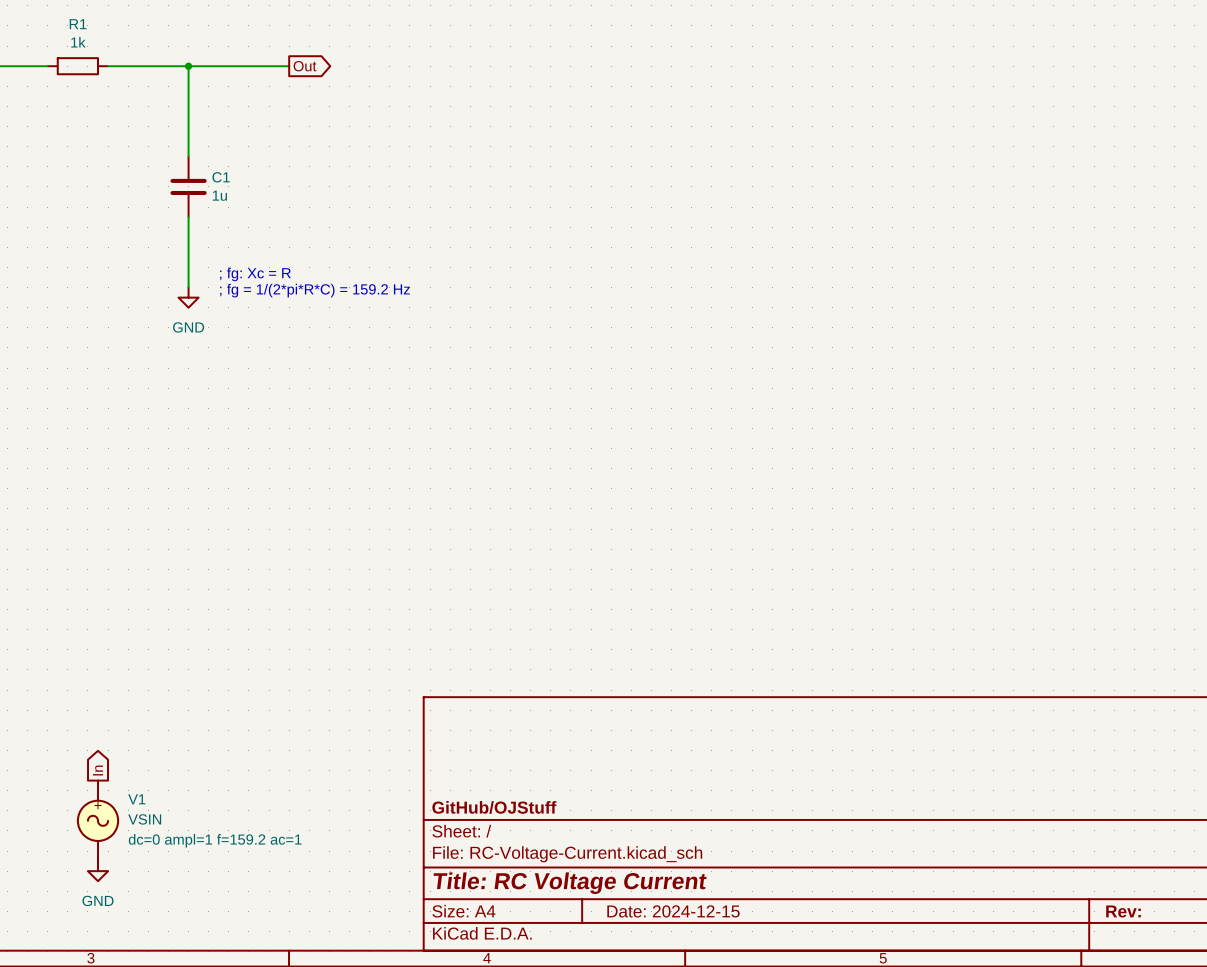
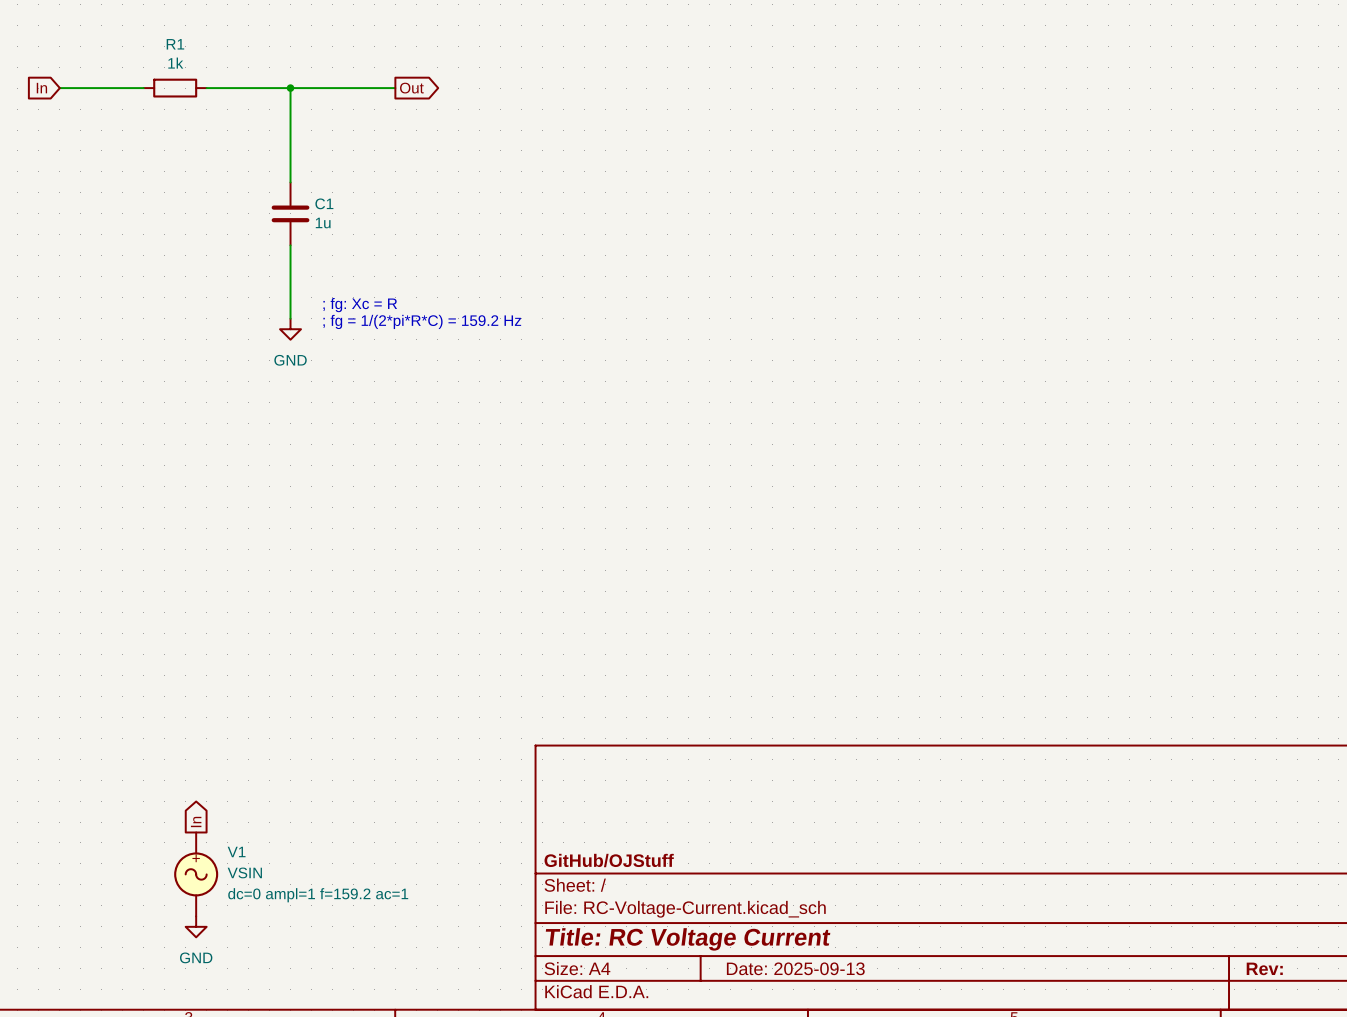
title block: Date: 2024-12-15 (673, 911) -> Date: 2025-09-13 (795, 968)

